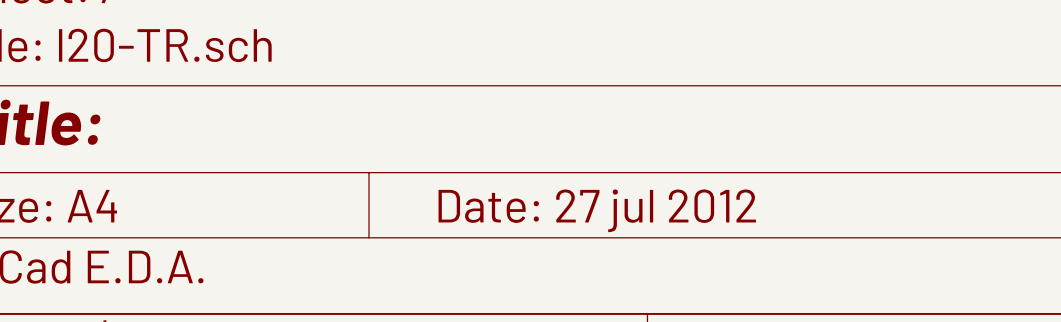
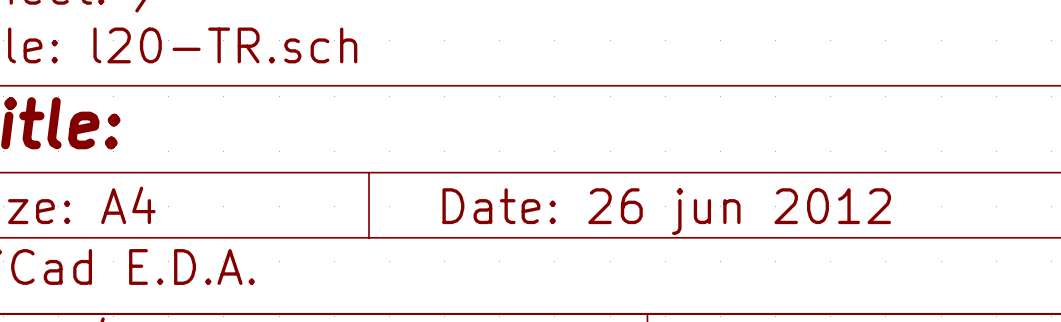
title block: Date: 27 jul 2012 (597, 210) -> Date: 26 jun 2012 (666, 211)

